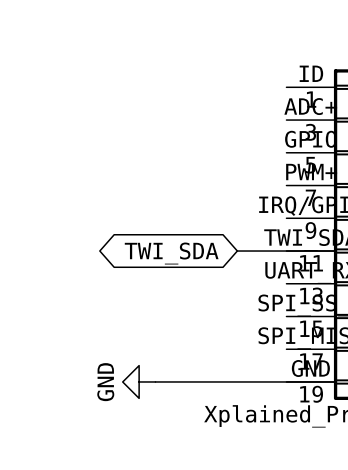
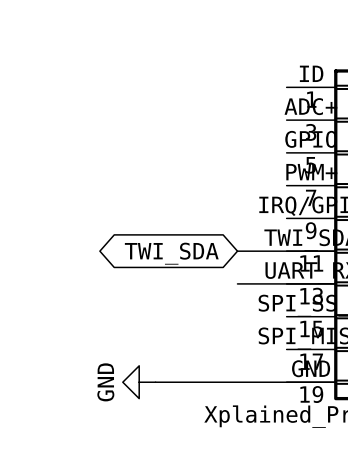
wire: none -> (237, 283) (335, 283)

